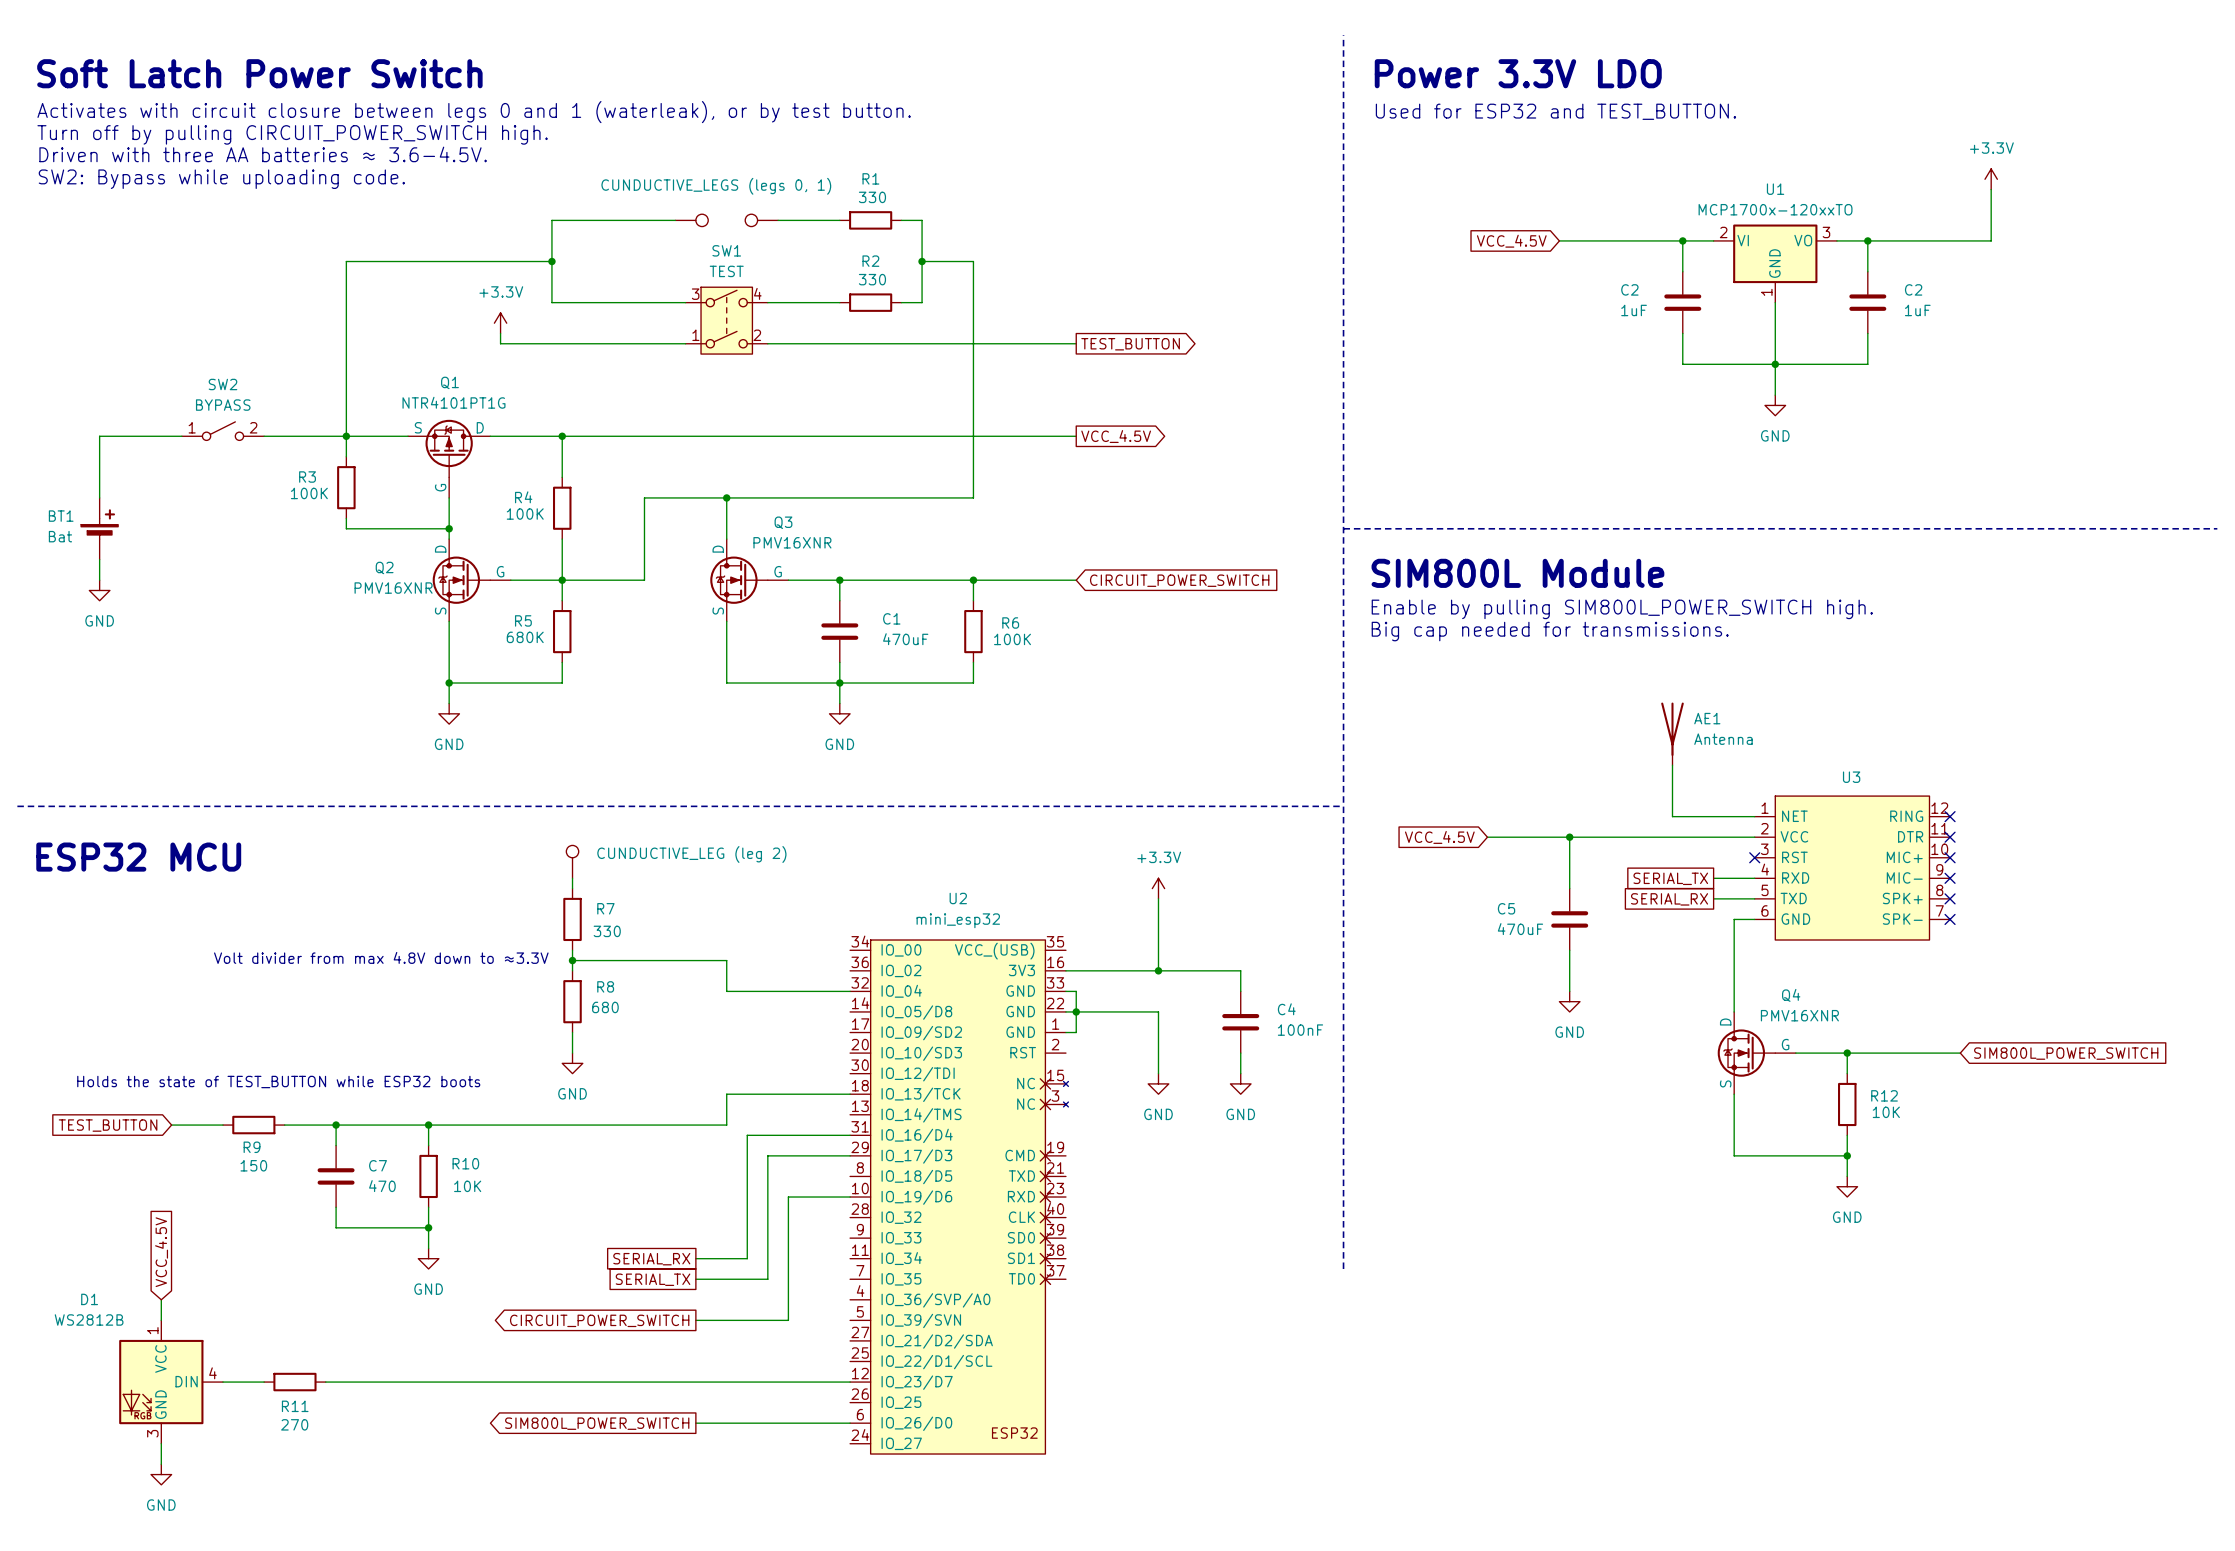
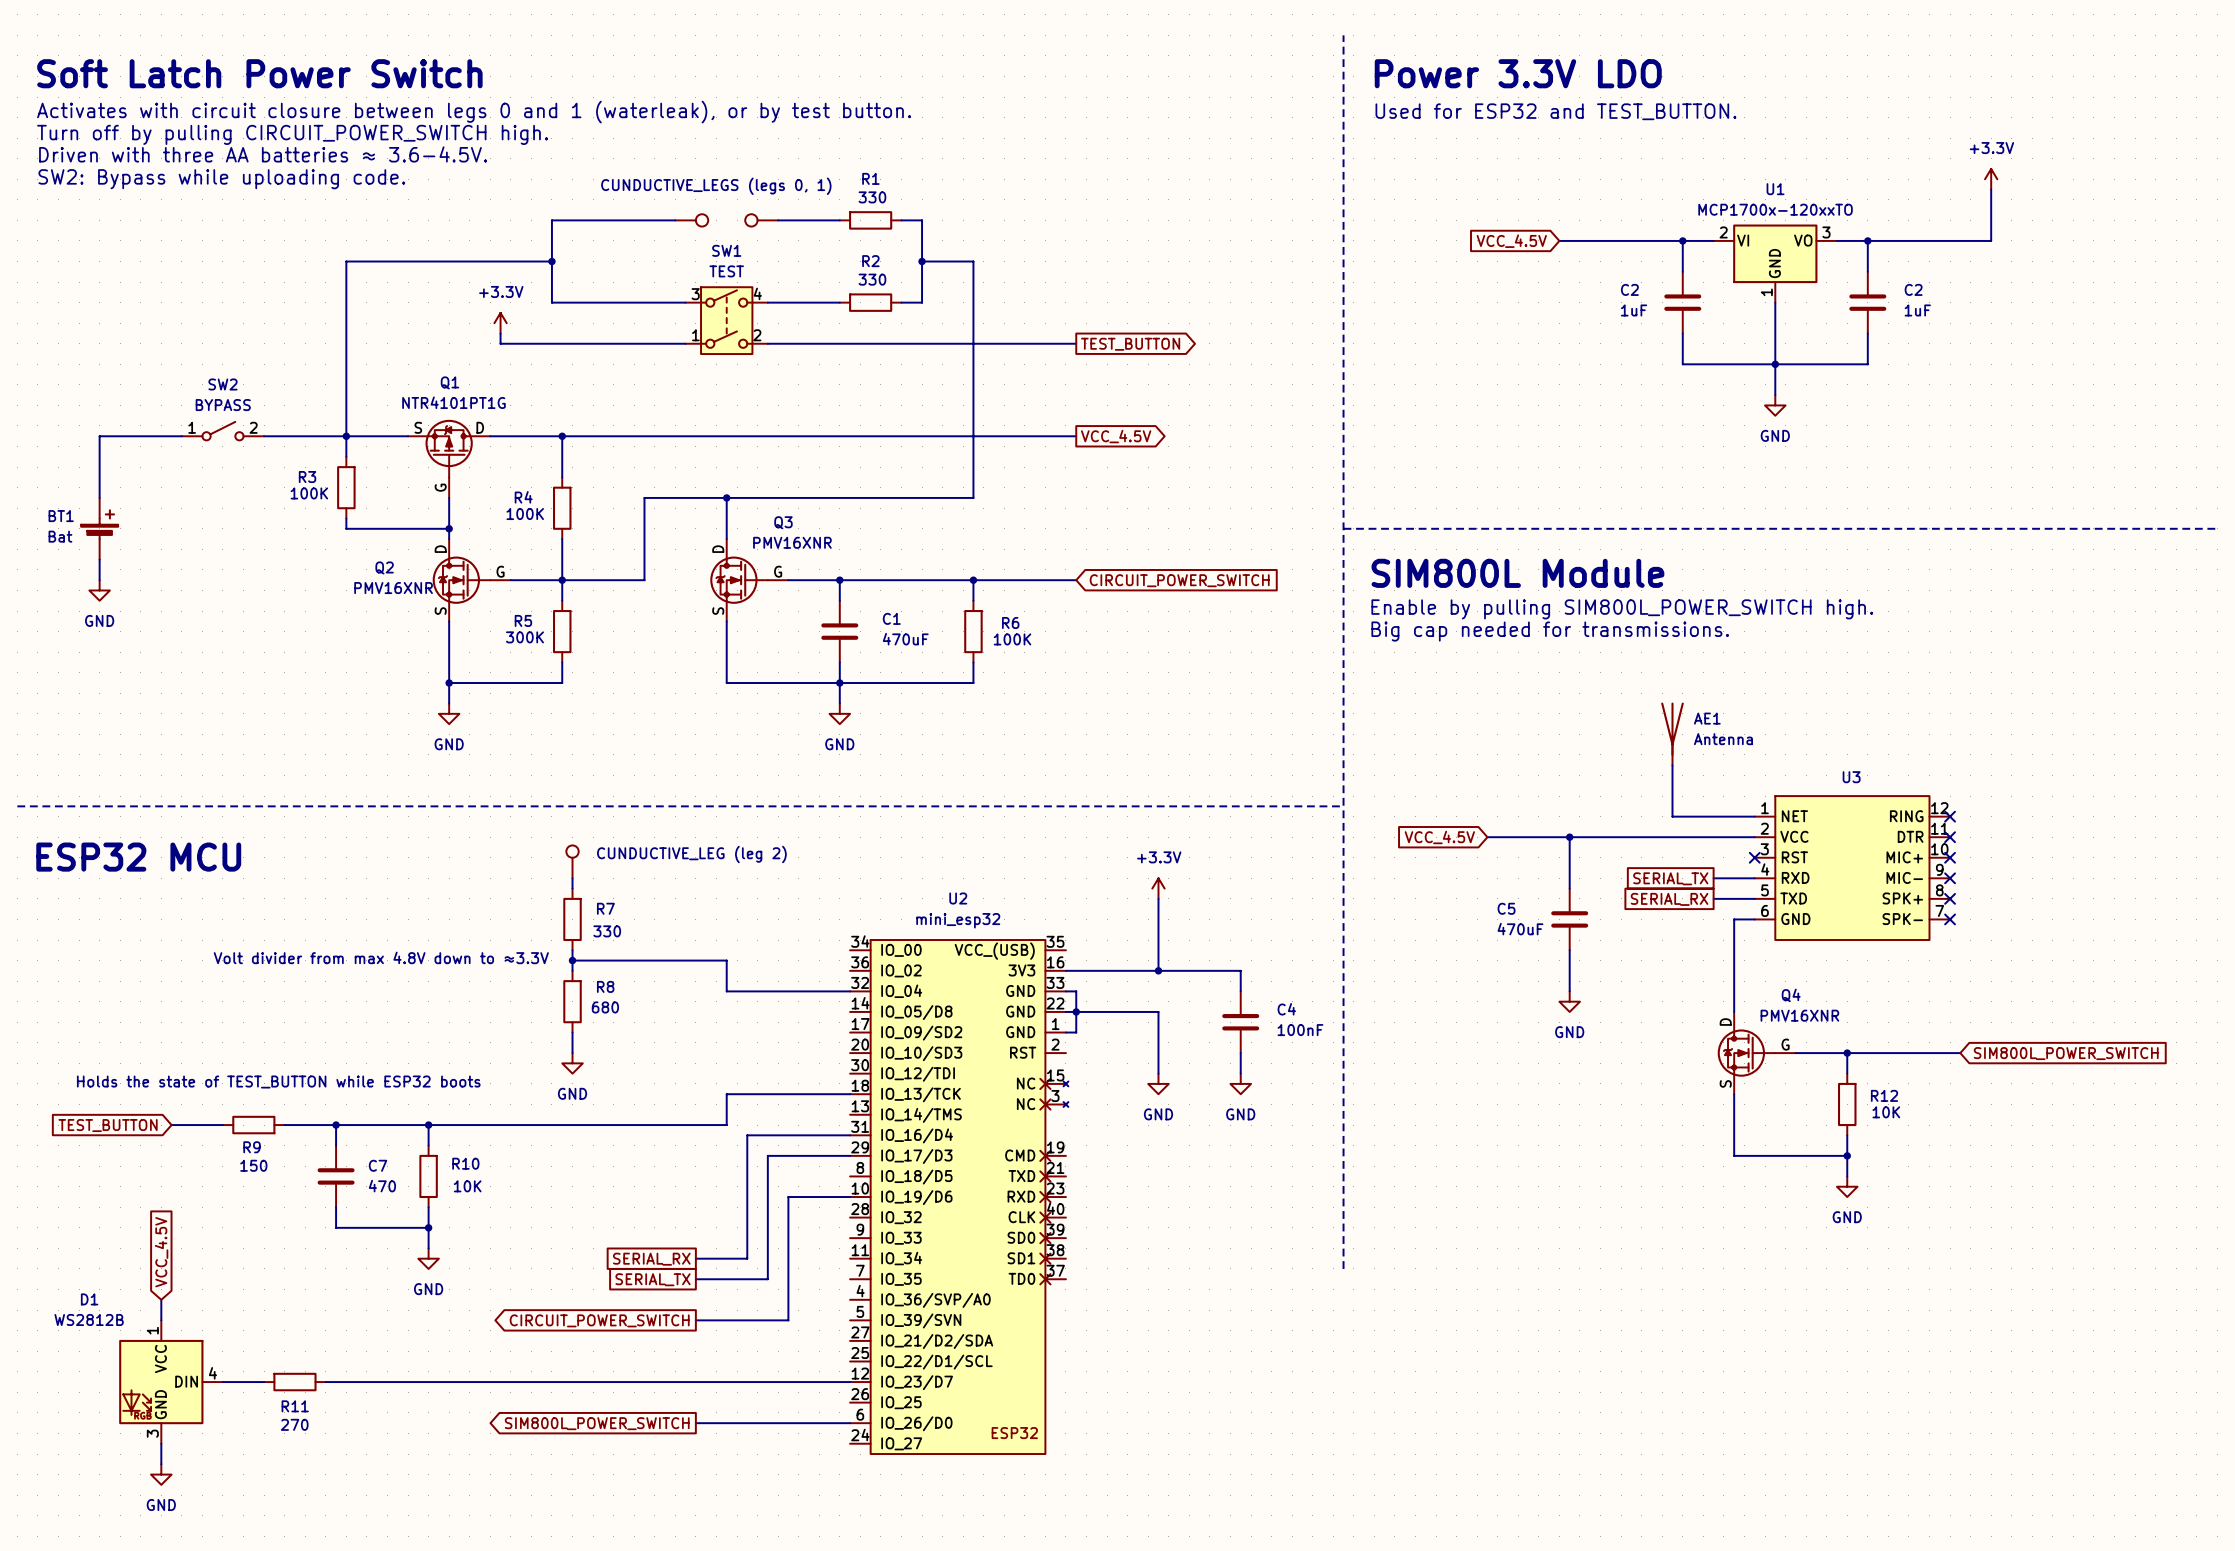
R5 value: 680K (525, 637) -> 300K (524, 637)

